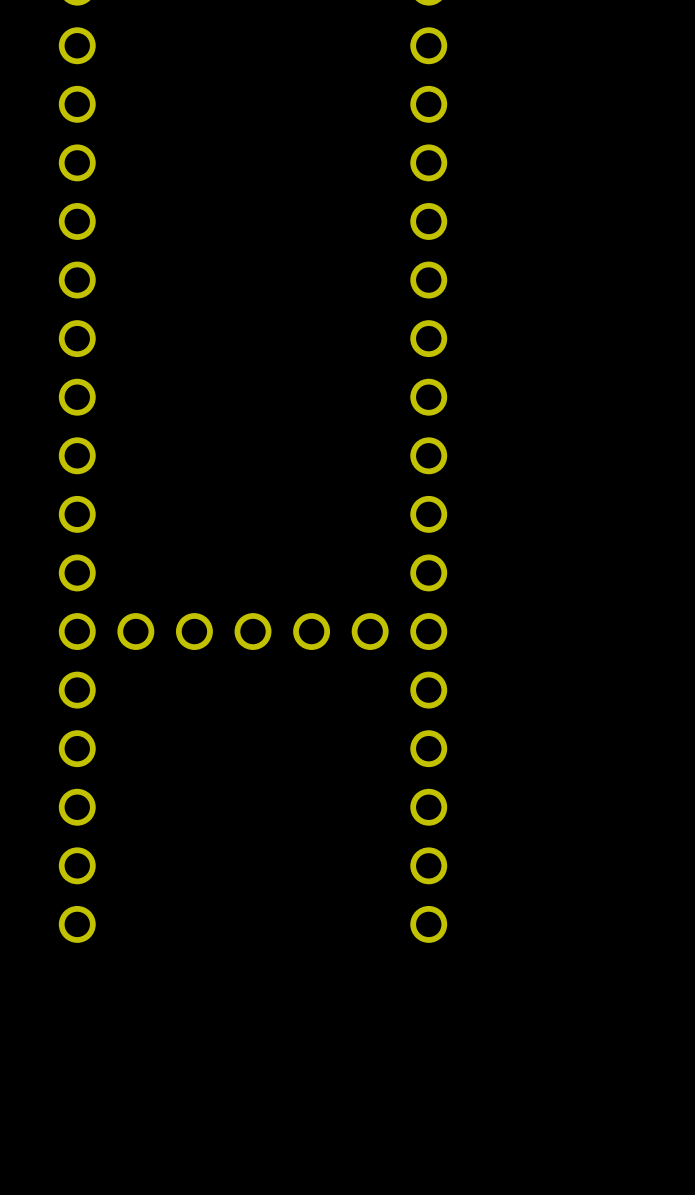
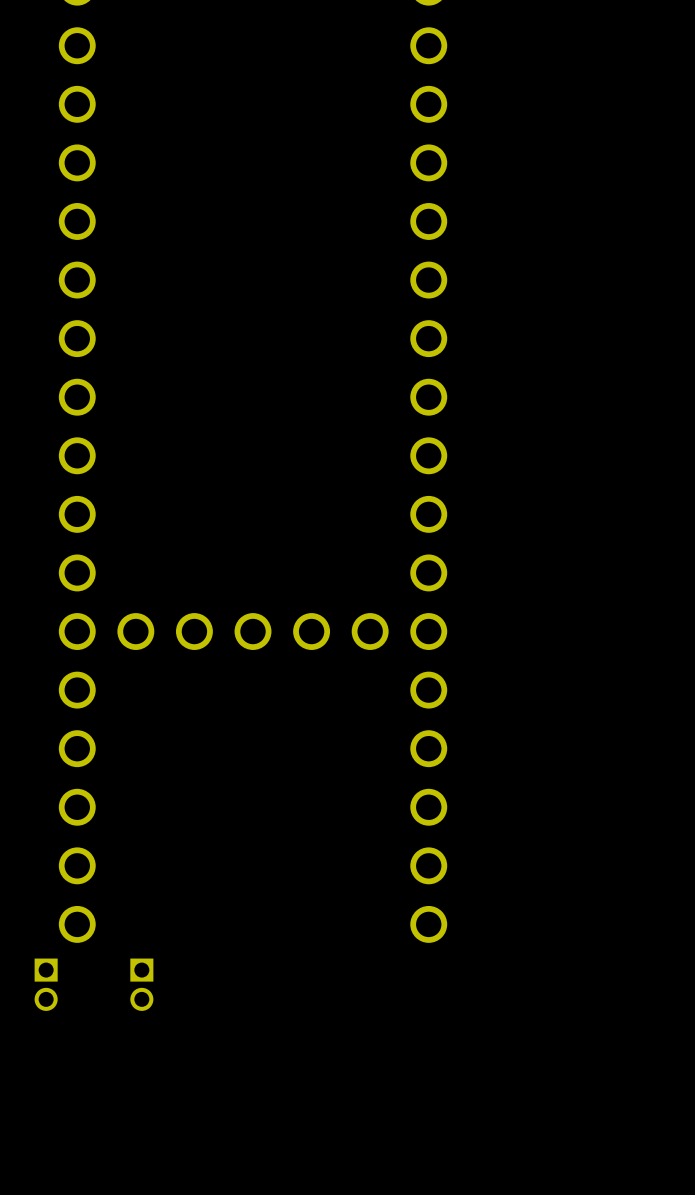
part: none -> (46, 984)
part: none -> (141, 984)

